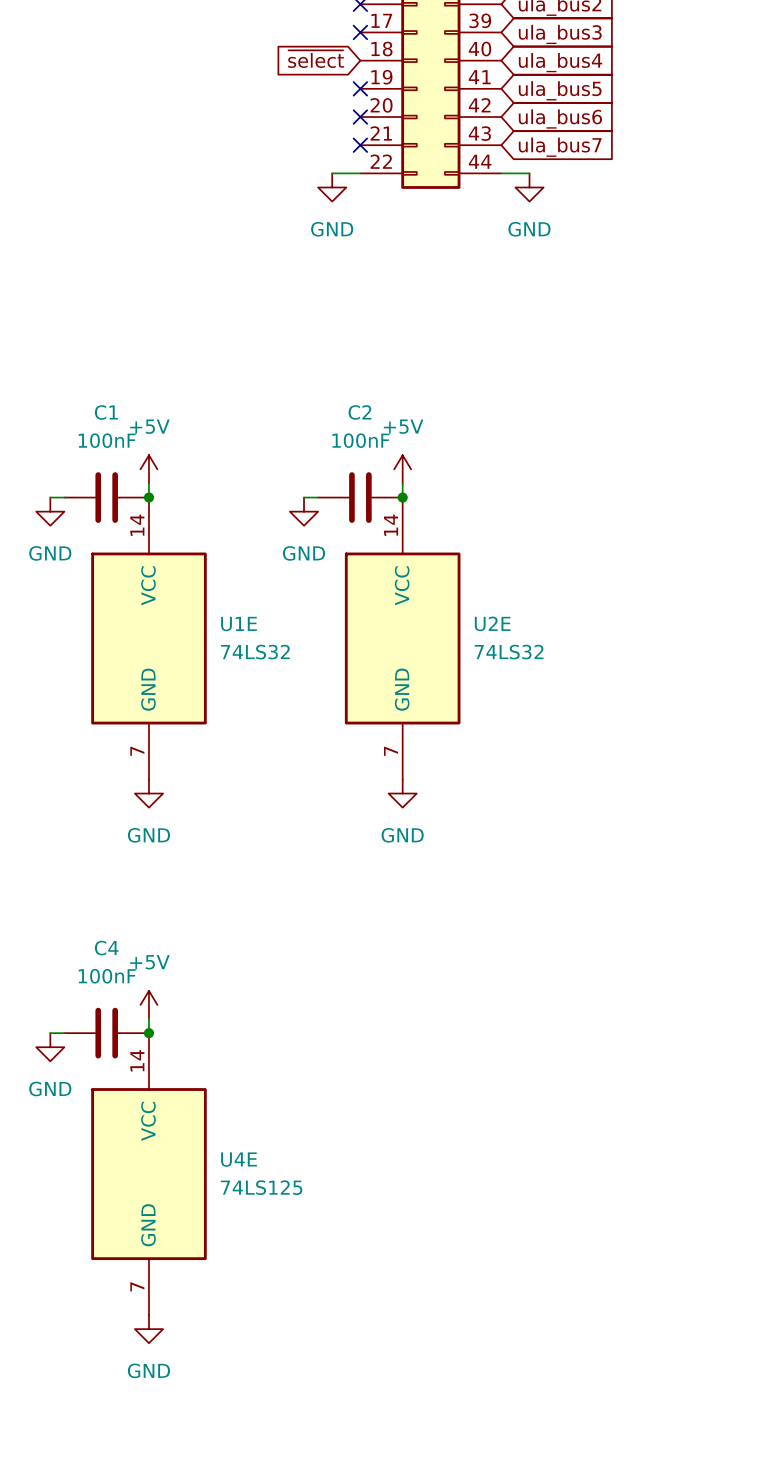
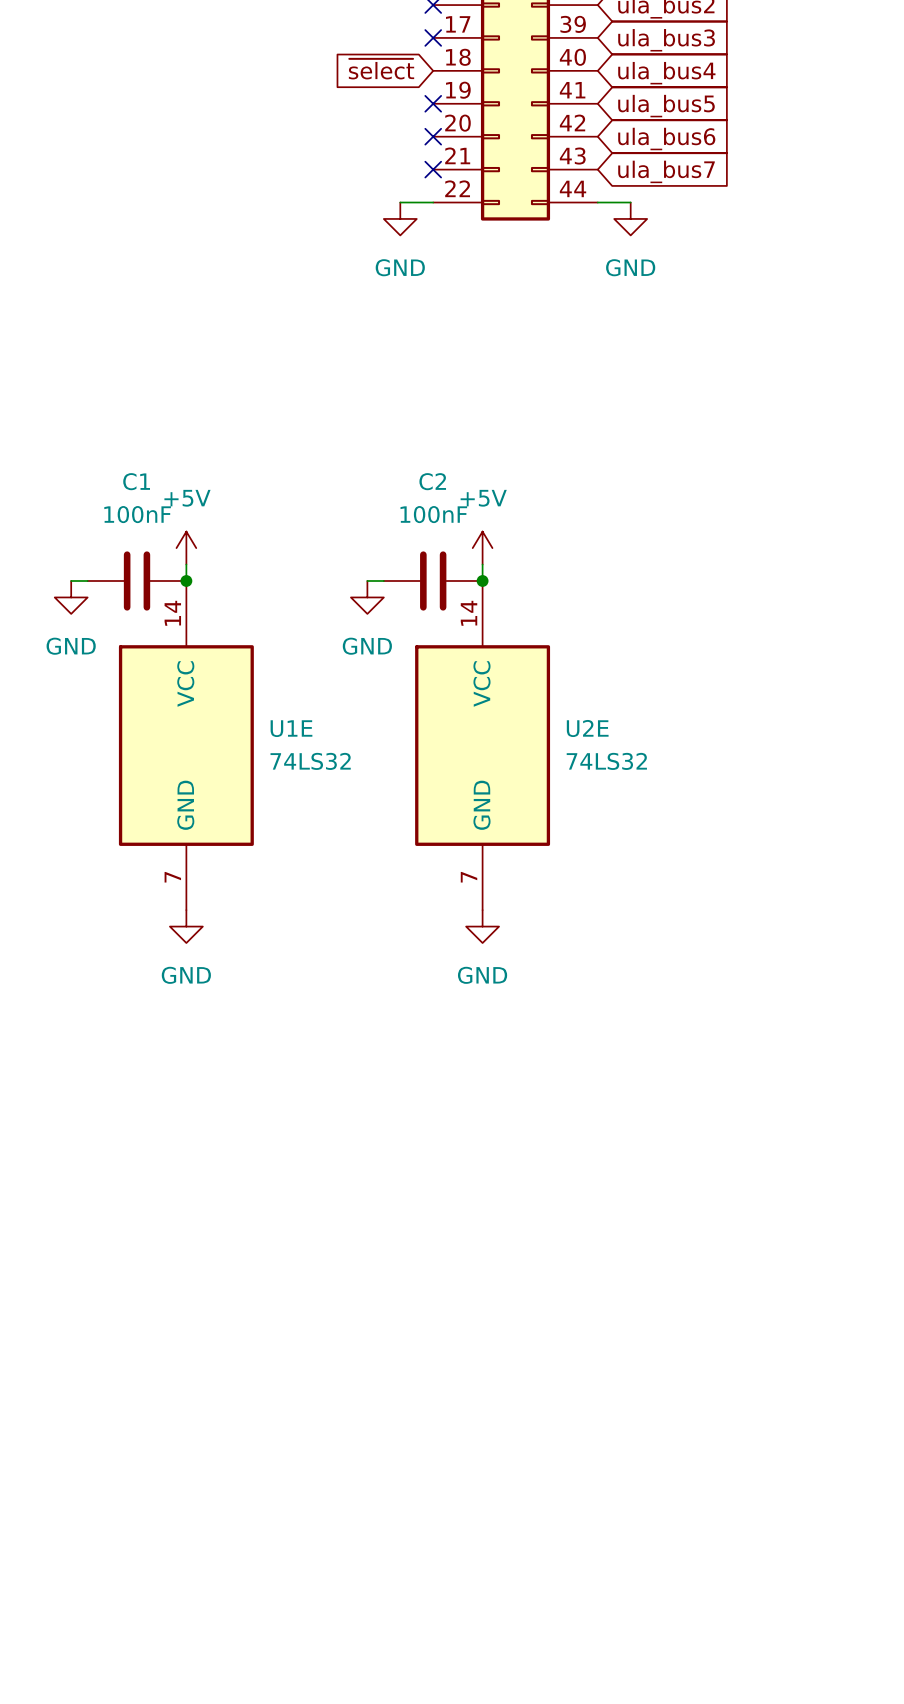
power symbol: +5V (148, 1004) -> none
wire: (148, 1019) (148, 1033) -> none
wire: (50, 1033) (64, 1033) -> none
C4: 100nF (106, 1033) -> none
junction: (148, 1033) -> none
power symbol: GND (50, 1047) -> none
U4E: 74LS125 (148, 1174) -> none
power symbol: GND (148, 1329) -> none

